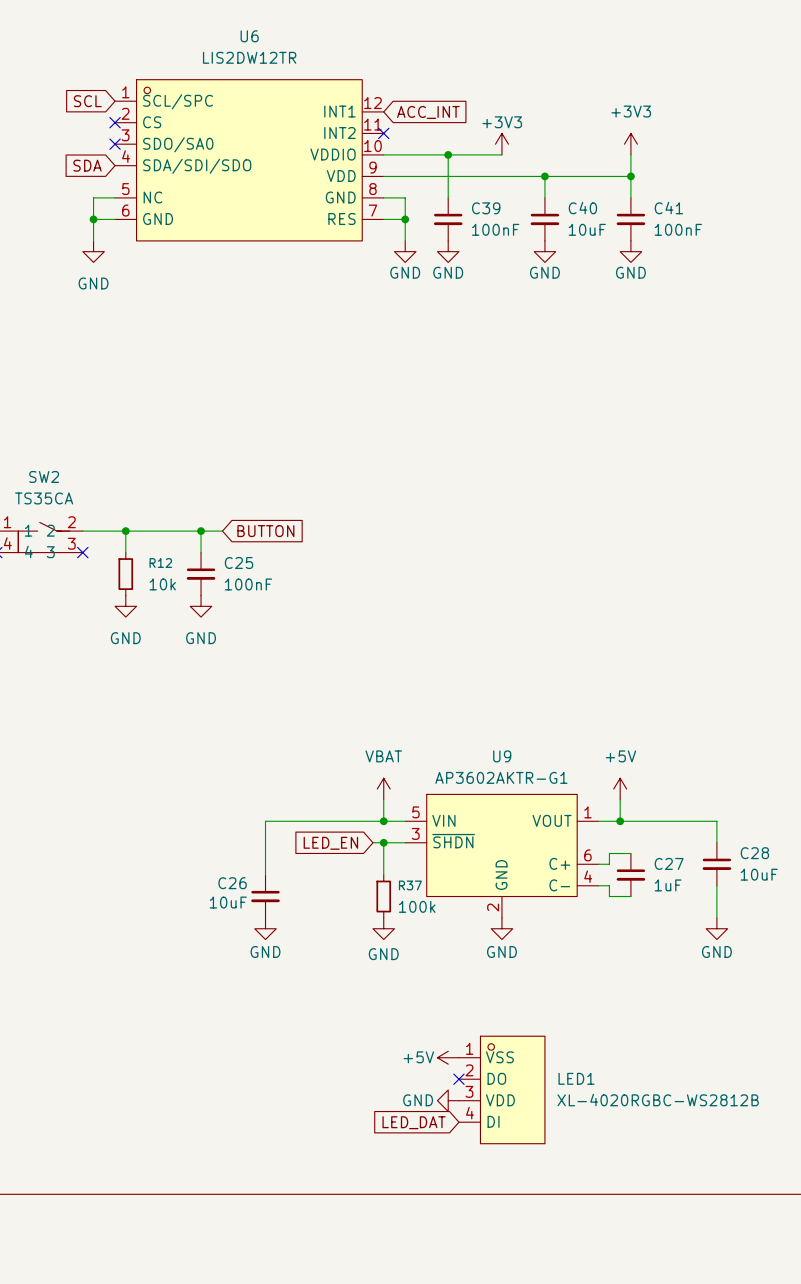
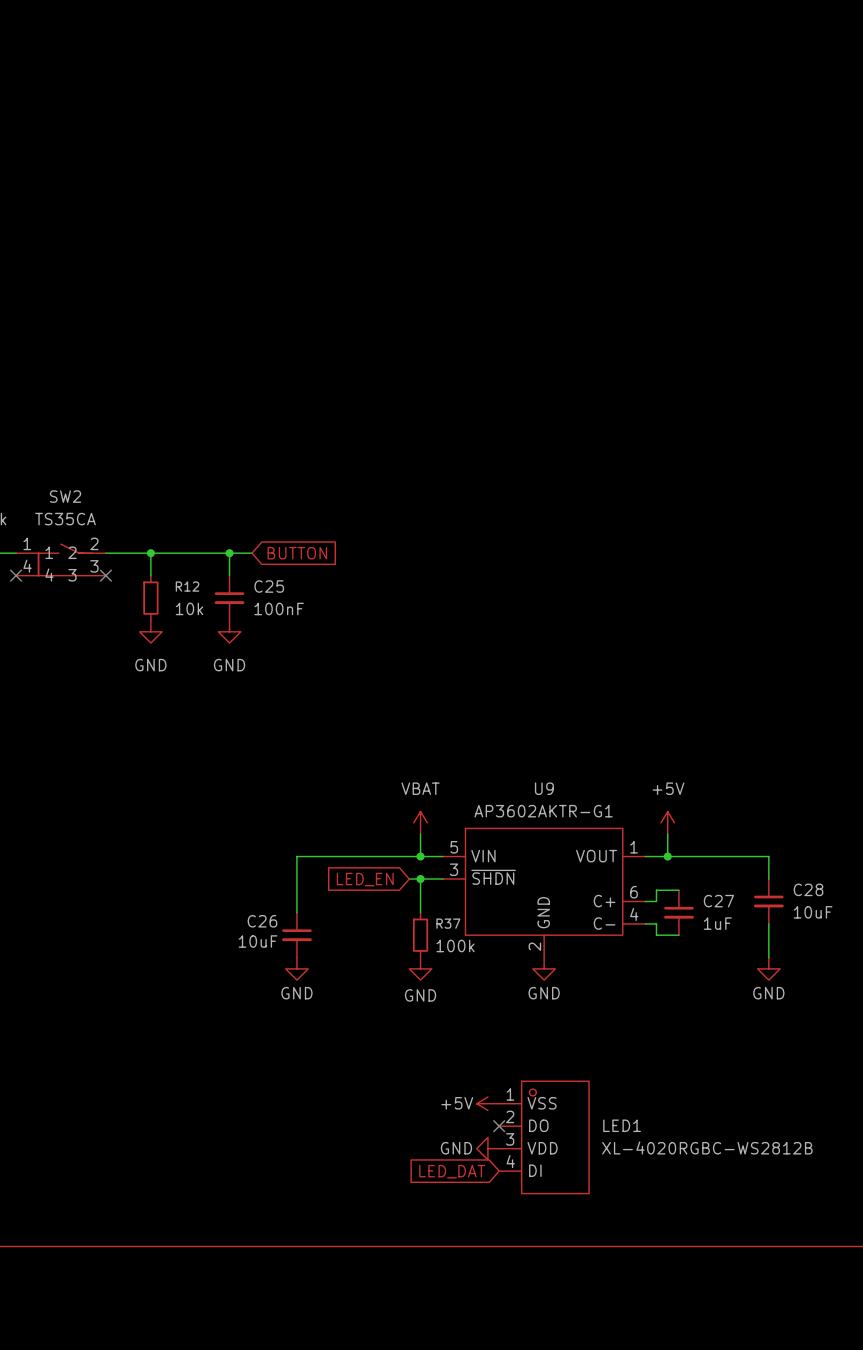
global label: SCL (87, 101) -> none
global label: ACC_INT (428, 112) -> none
no-connect mark: (115, 122) -> none
no-connect mark: (383, 133) -> none
no-connect mark: (115, 144) -> none
power symbol: +3V3 (501, 144) -> none
power symbol: +3V3 (630, 144) -> none
wire: (383, 154) (501, 154) -> none
wire: (448, 154) (448, 197) -> none
junction: (448, 154) -> none
wire: (630, 154) (630, 197) -> none
U6: LIS2DW12TR (249, 160) -> none
global label: SDA (87, 165) -> none
wire: (383, 176) (630, 176) -> none
wire: (544, 176) (544, 197) -> none
junction: (544, 176) -> none
junction: (630, 176) -> none
wire: (115, 197) (93, 197) (93, 240) -> none
wire: (383, 197) (405, 197) (405, 240) -> none
wire: (93, 219) (115, 219) -> none
junction: (93, 219) -> none
wire: (383, 219) (405, 219) -> none
junction: (405, 219) -> none
C39: 100nF (448, 219) -> none
C40: 10uF (544, 219) -> none
C41: 100nF (630, 219) -> none
power symbol: GND (93, 251) -> none
power symbol: GND (405, 251) -> none
power symbol: GND (448, 251) -> none
power symbol: GND (544, 251) -> none
power symbol: GND (630, 251) -> none

